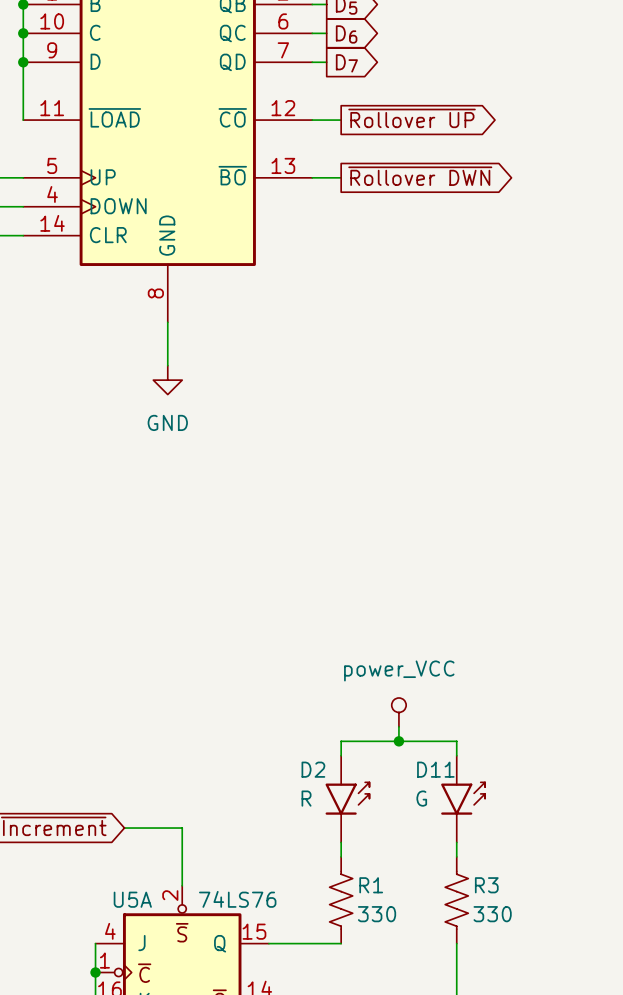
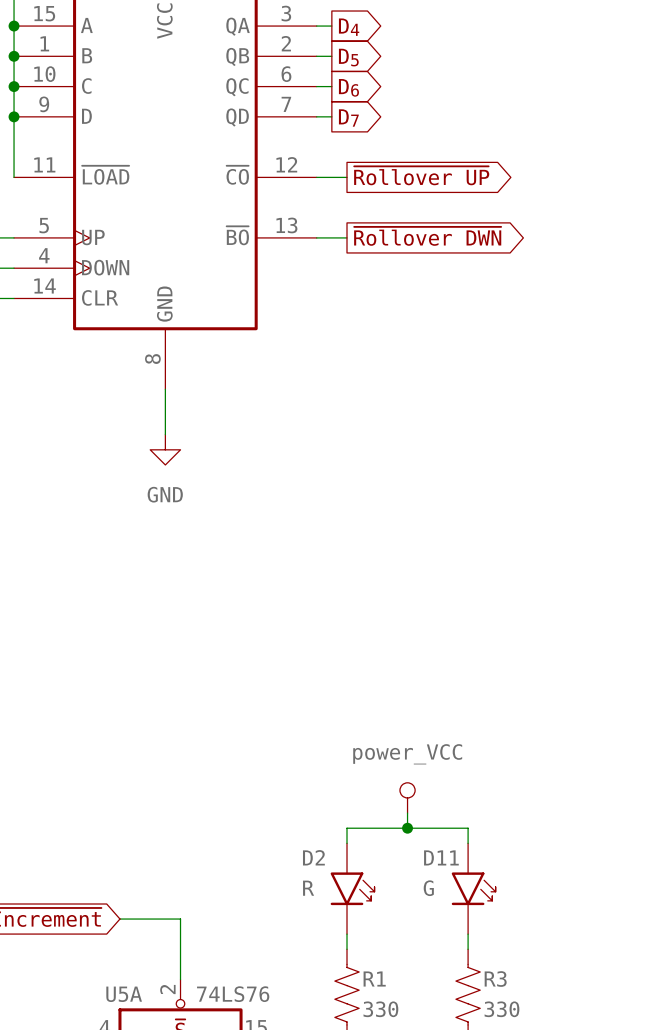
D2 symbol: [325, 755, 370, 843] -> [330, 843, 375, 935]
D11 symbol: [441, 755, 486, 843] -> [451, 843, 496, 935]

